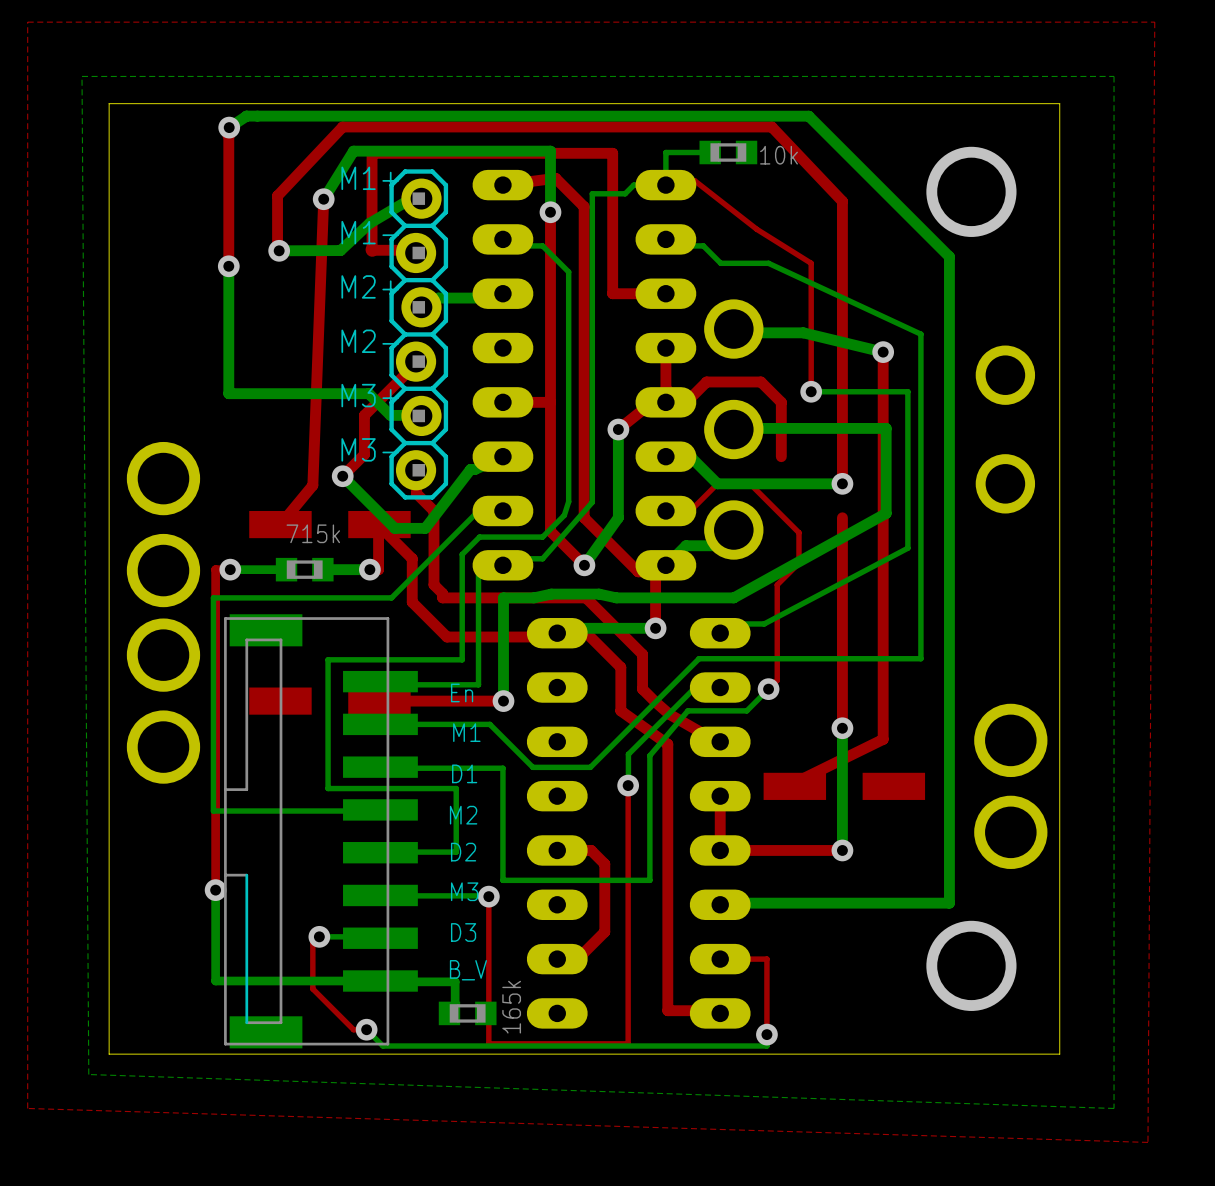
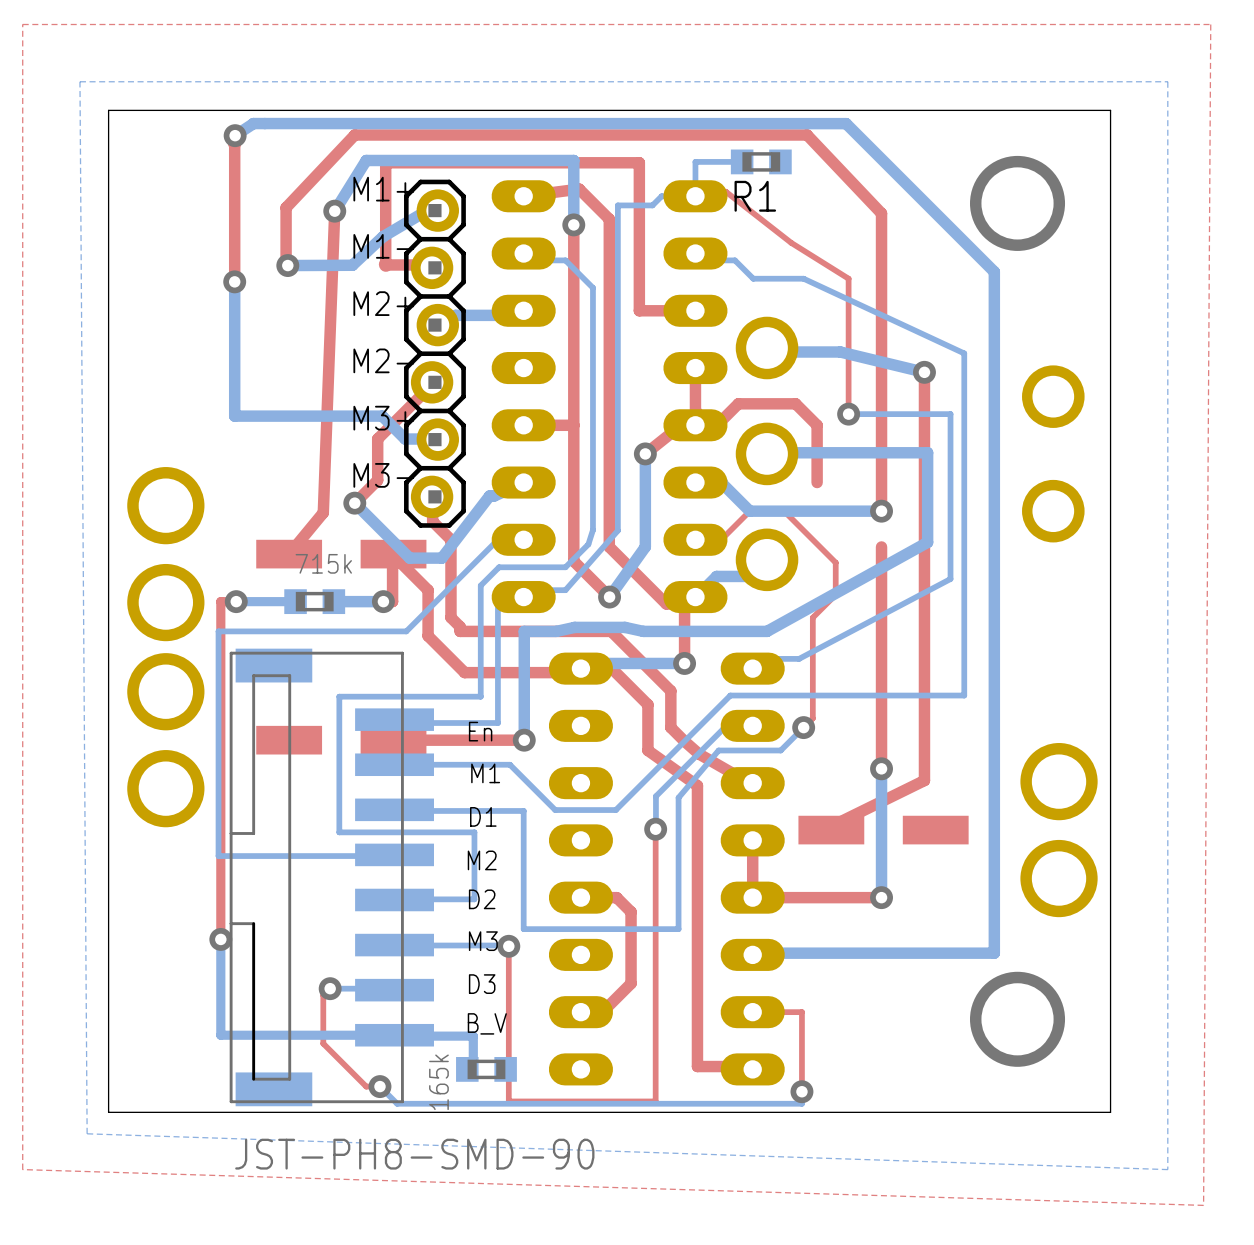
R1 value: 10k (779, 155) -> none
R1 name: none -> R1 (755, 196)
part value position: 165k (511, 1007) -> 165k (438, 1082)
part value: none -> JST-PH8-SMD-90 (414, 1154)

